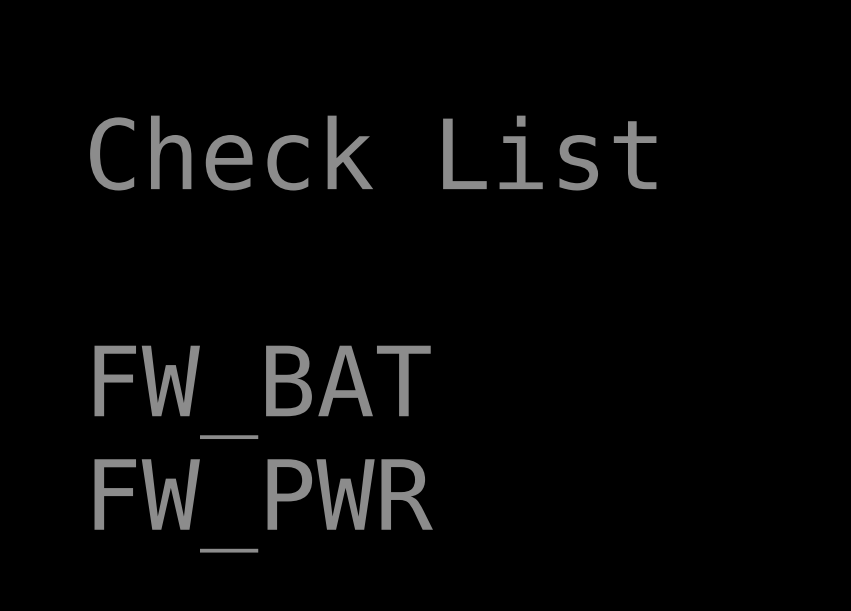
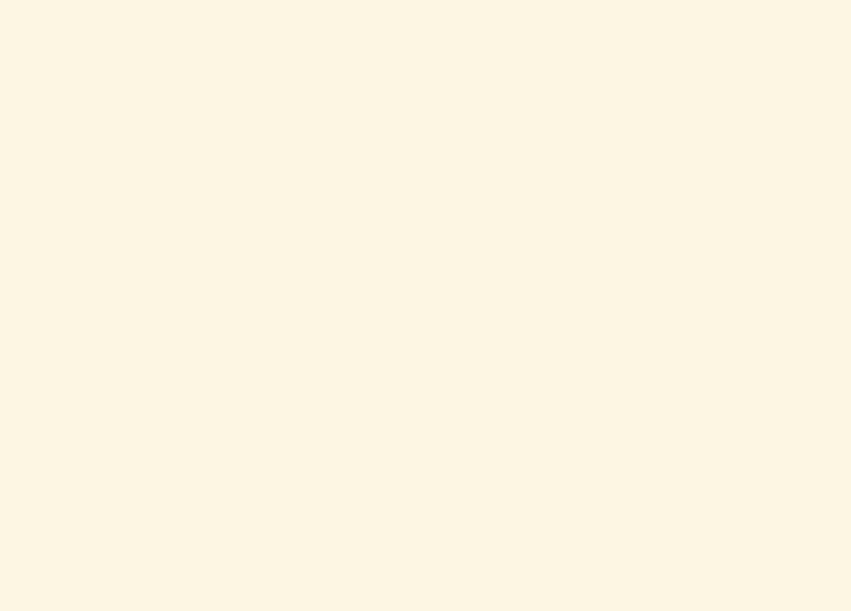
text: Check List (373, 153) -> none
text: FW_BAT (262, 392) -> none
text: FW_PWR (263, 505) -> none

